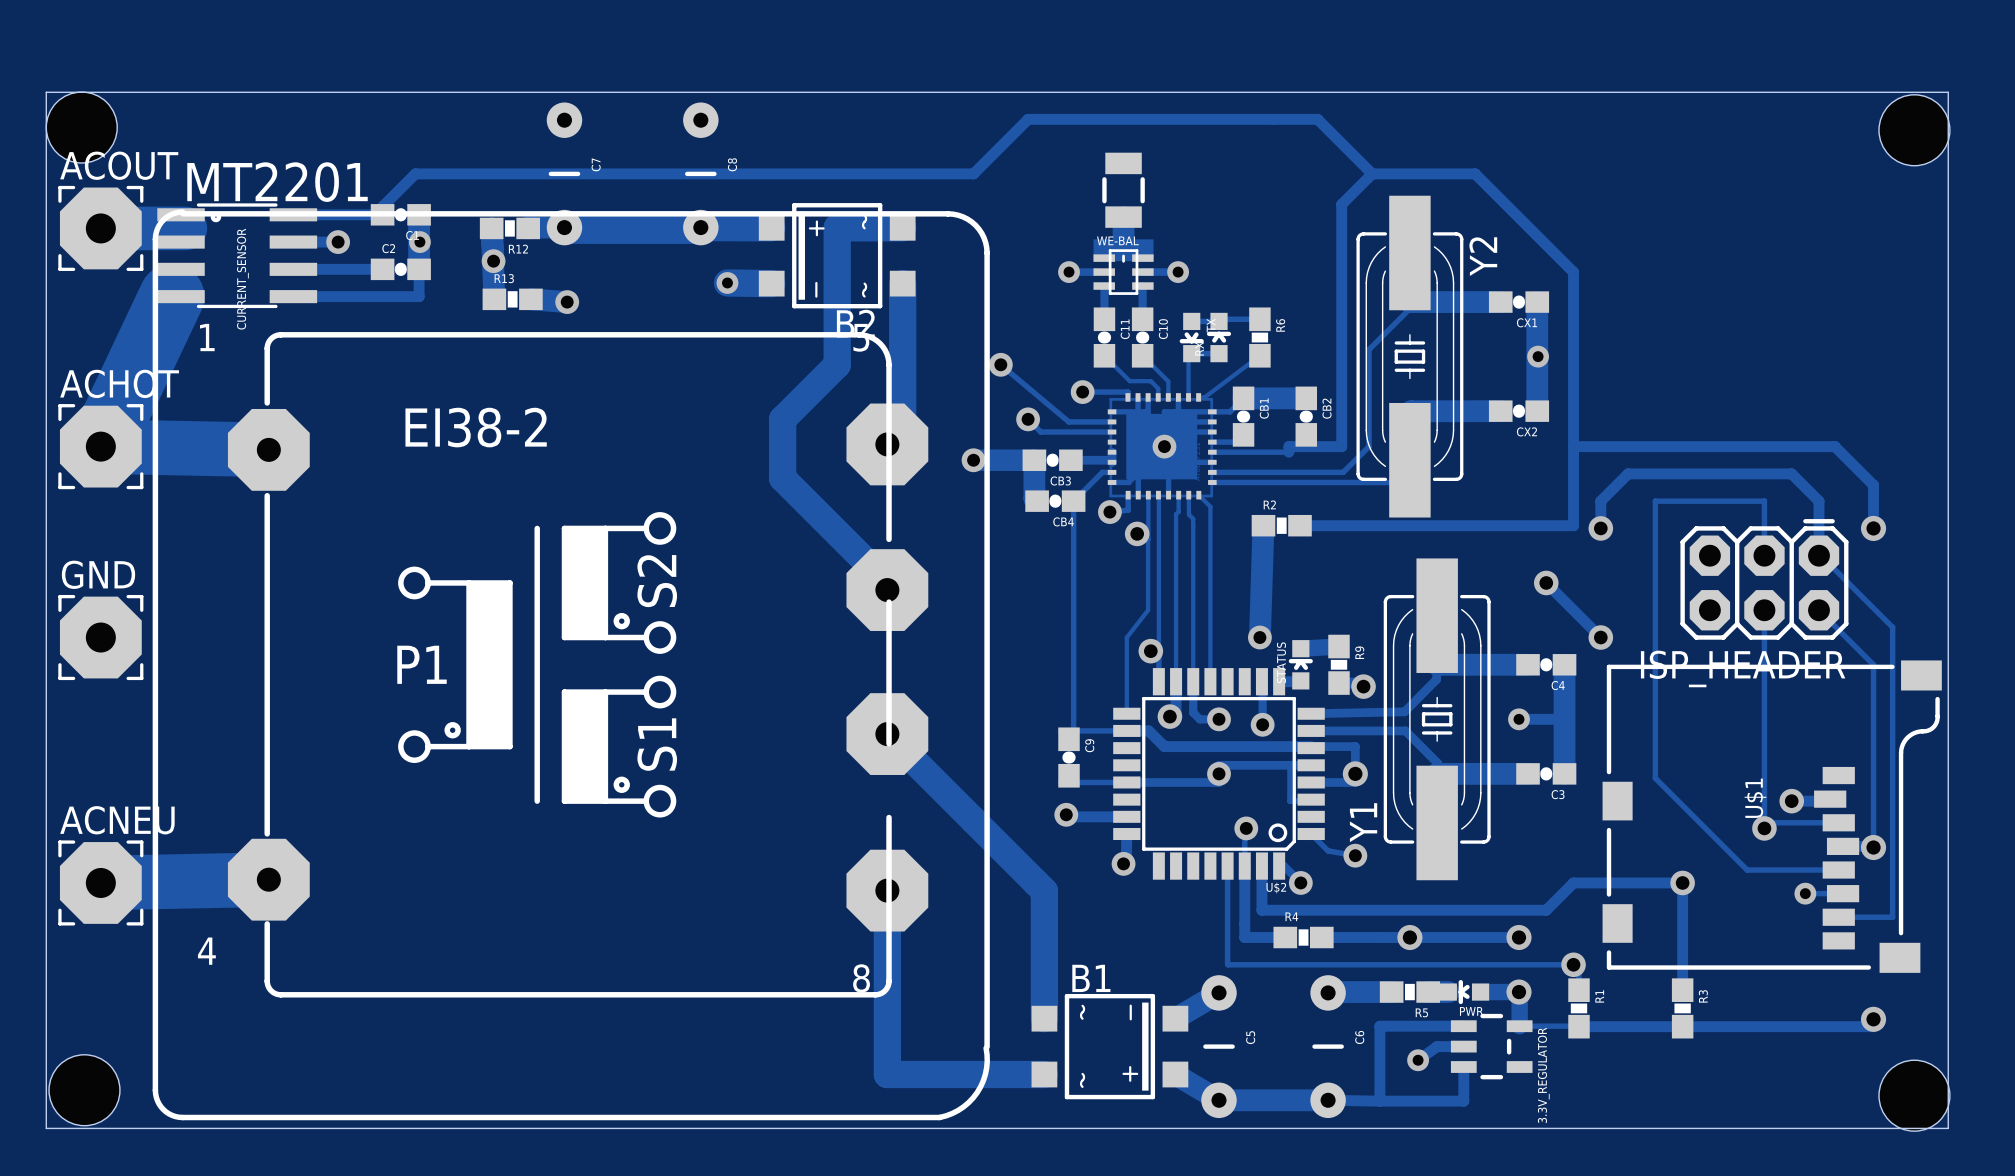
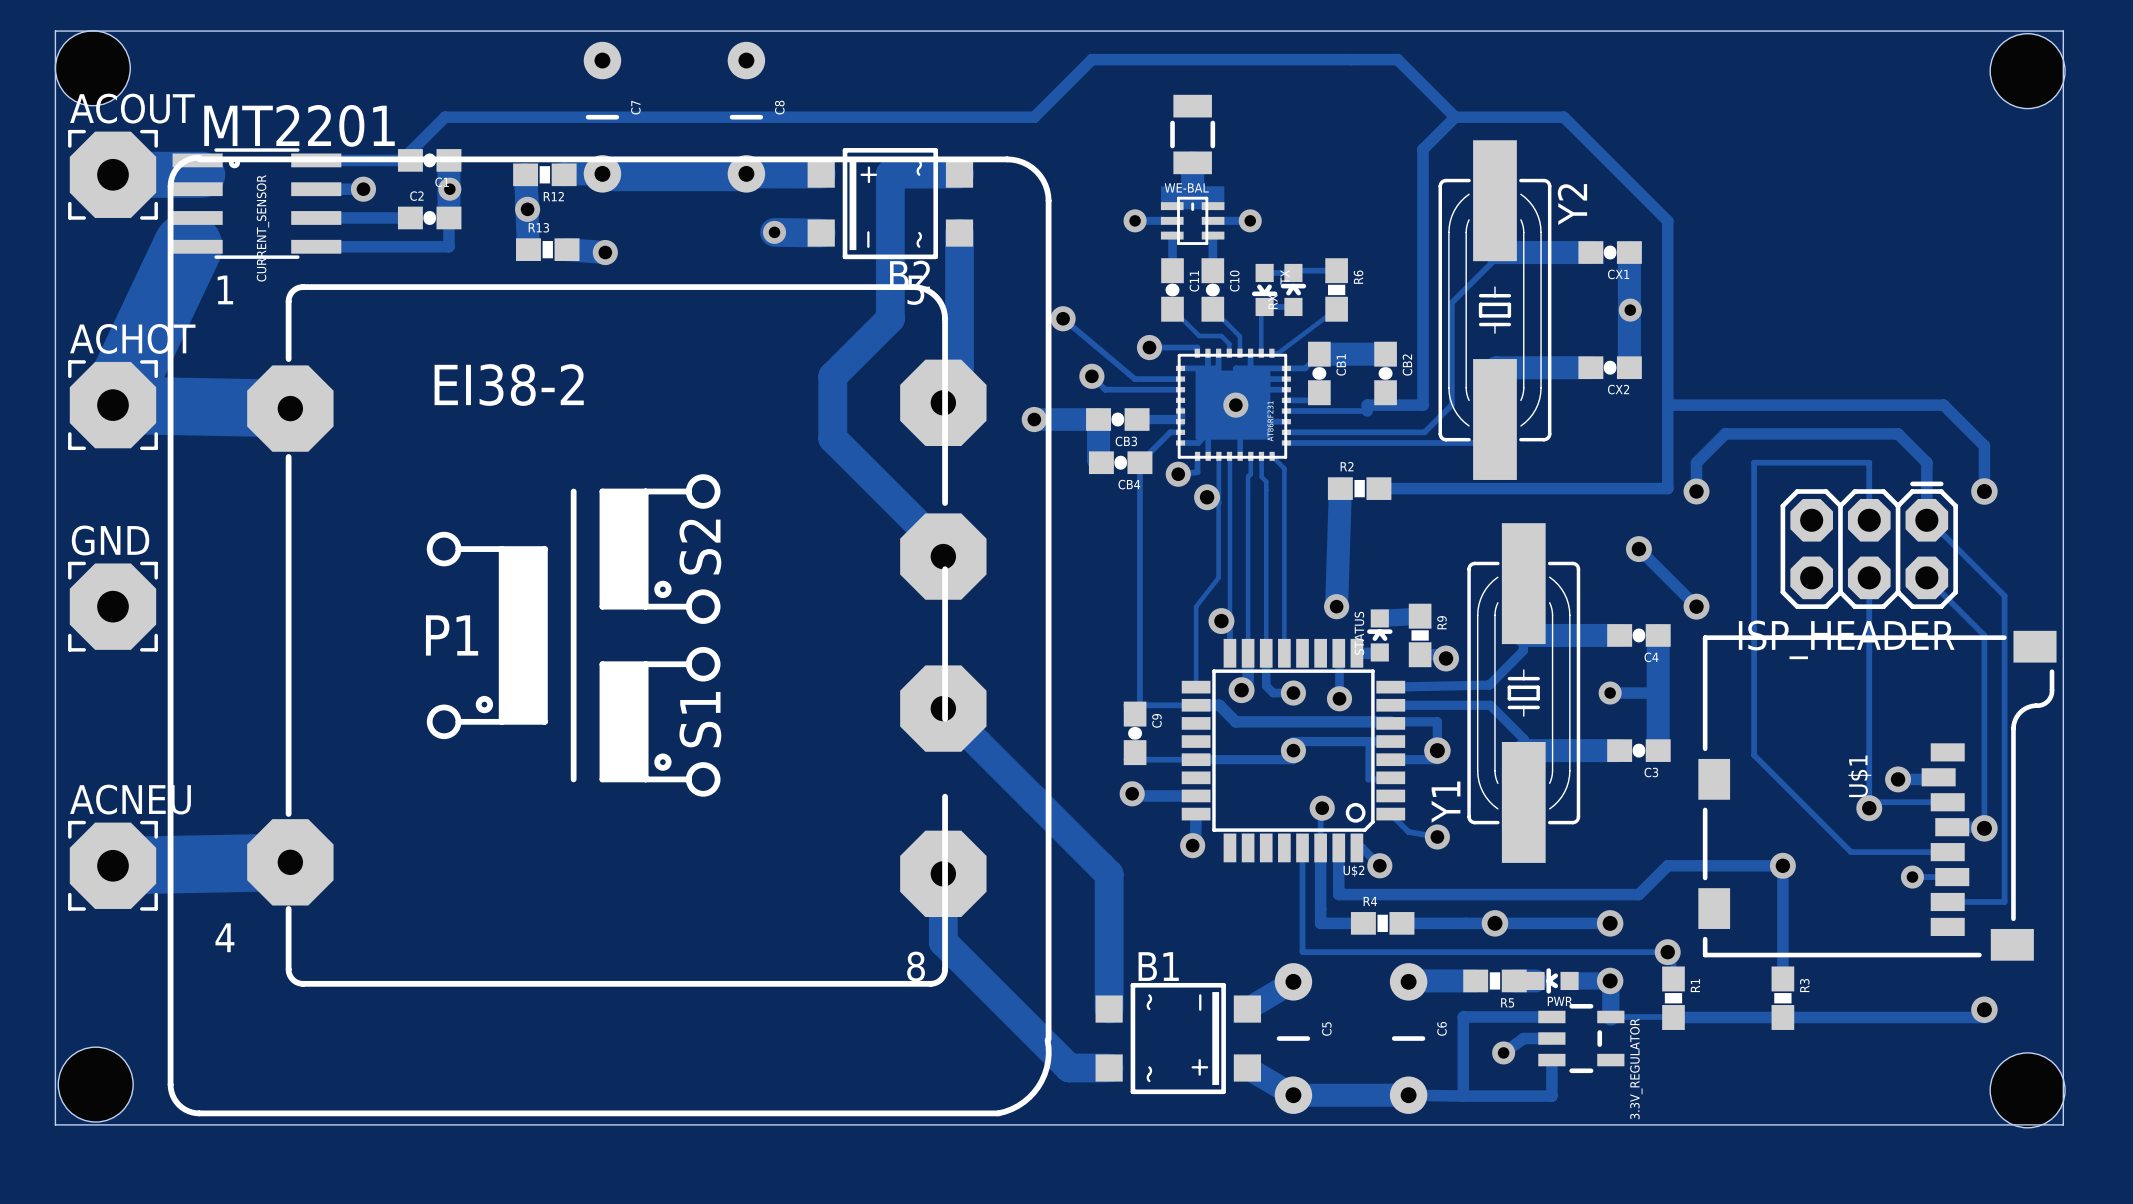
part footprint: [1107, 393, 1217, 500] -> [1176, 348, 1291, 461]
track: (887, 955) (887, 1074) (1006, 1074) -> (943, 942) (1069, 1068)

